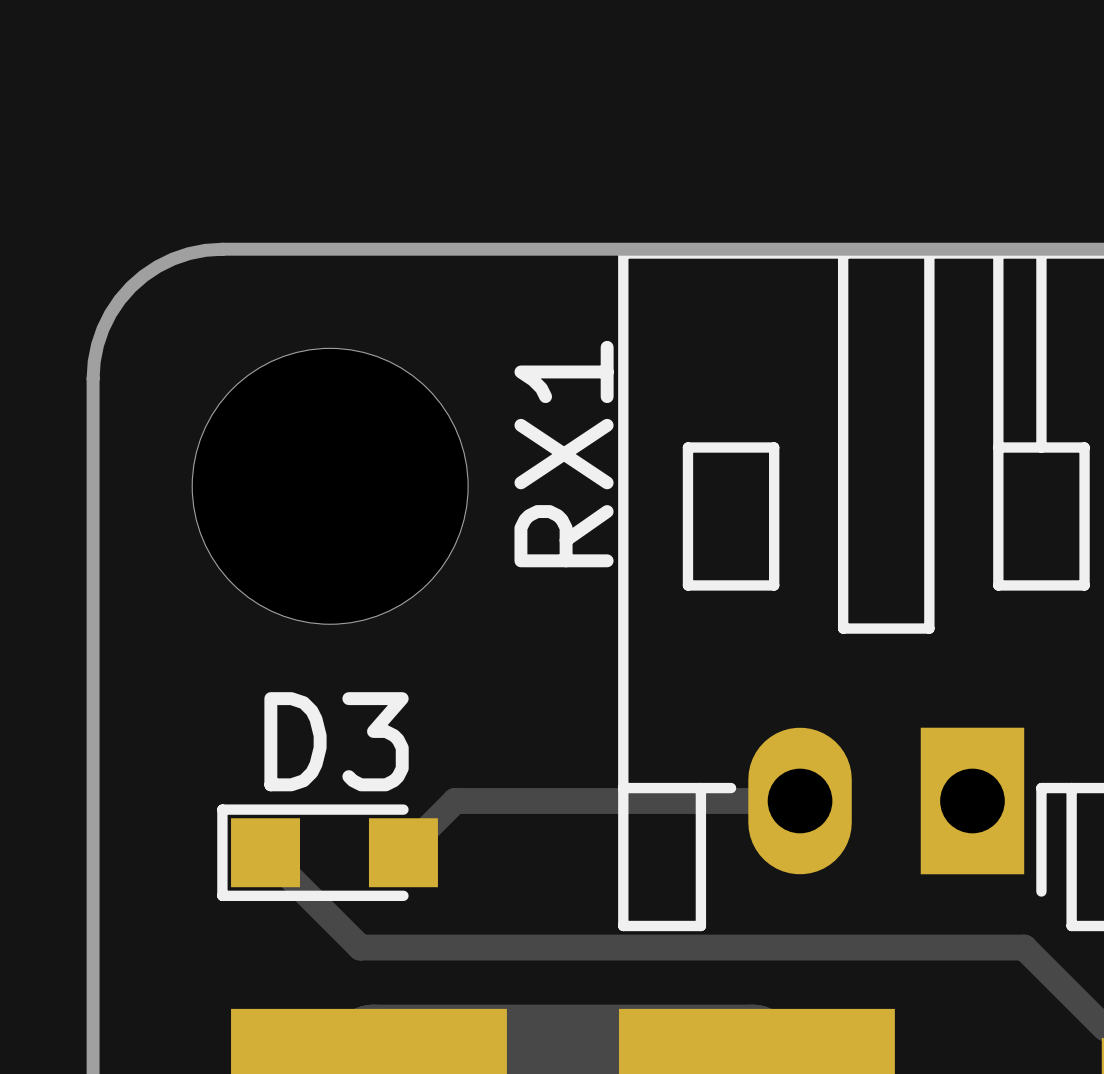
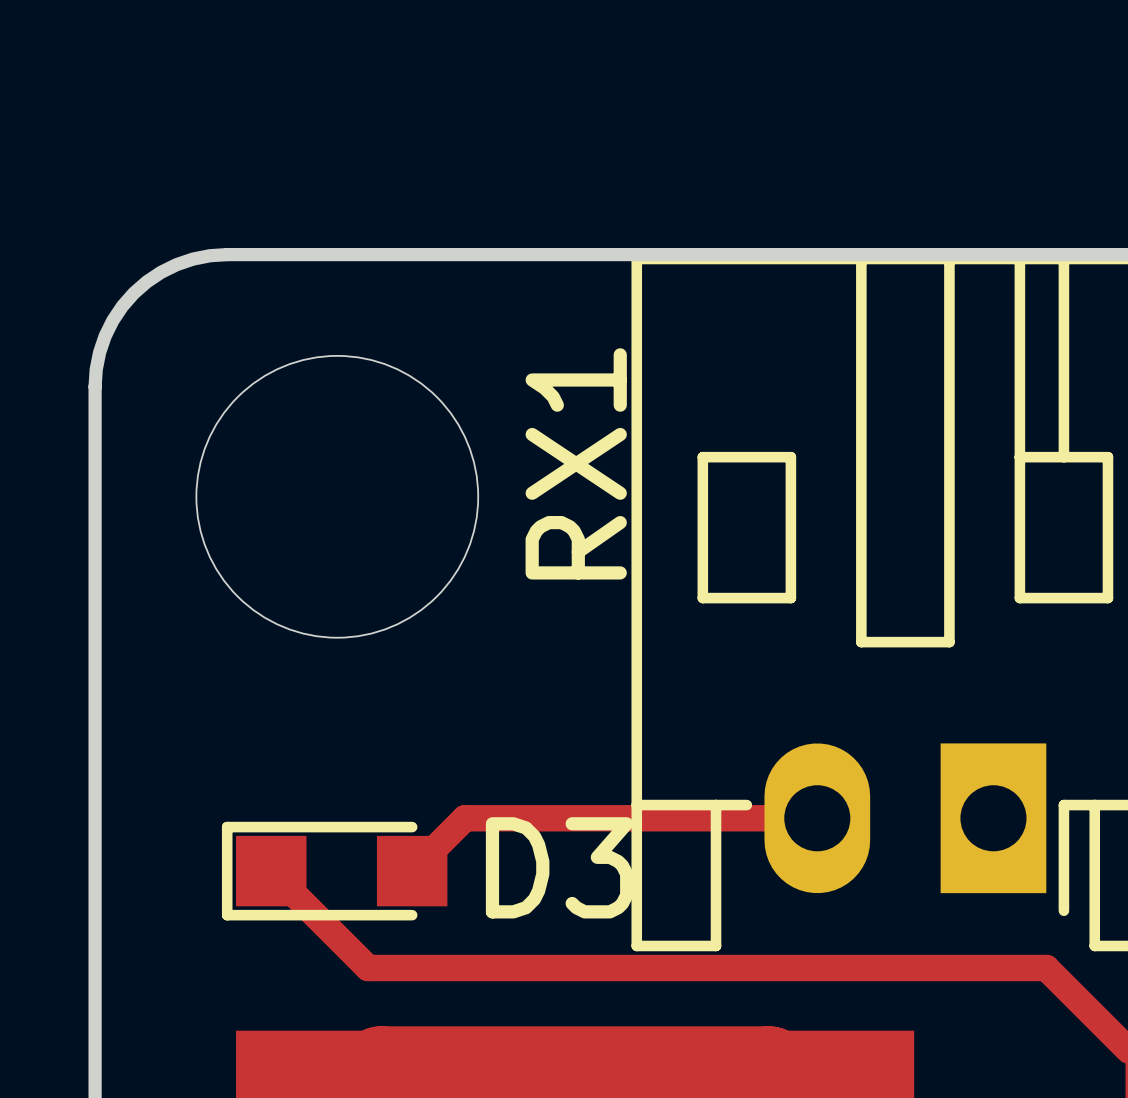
D3 name position: D3 (336, 741) -> D3 (559, 867)

